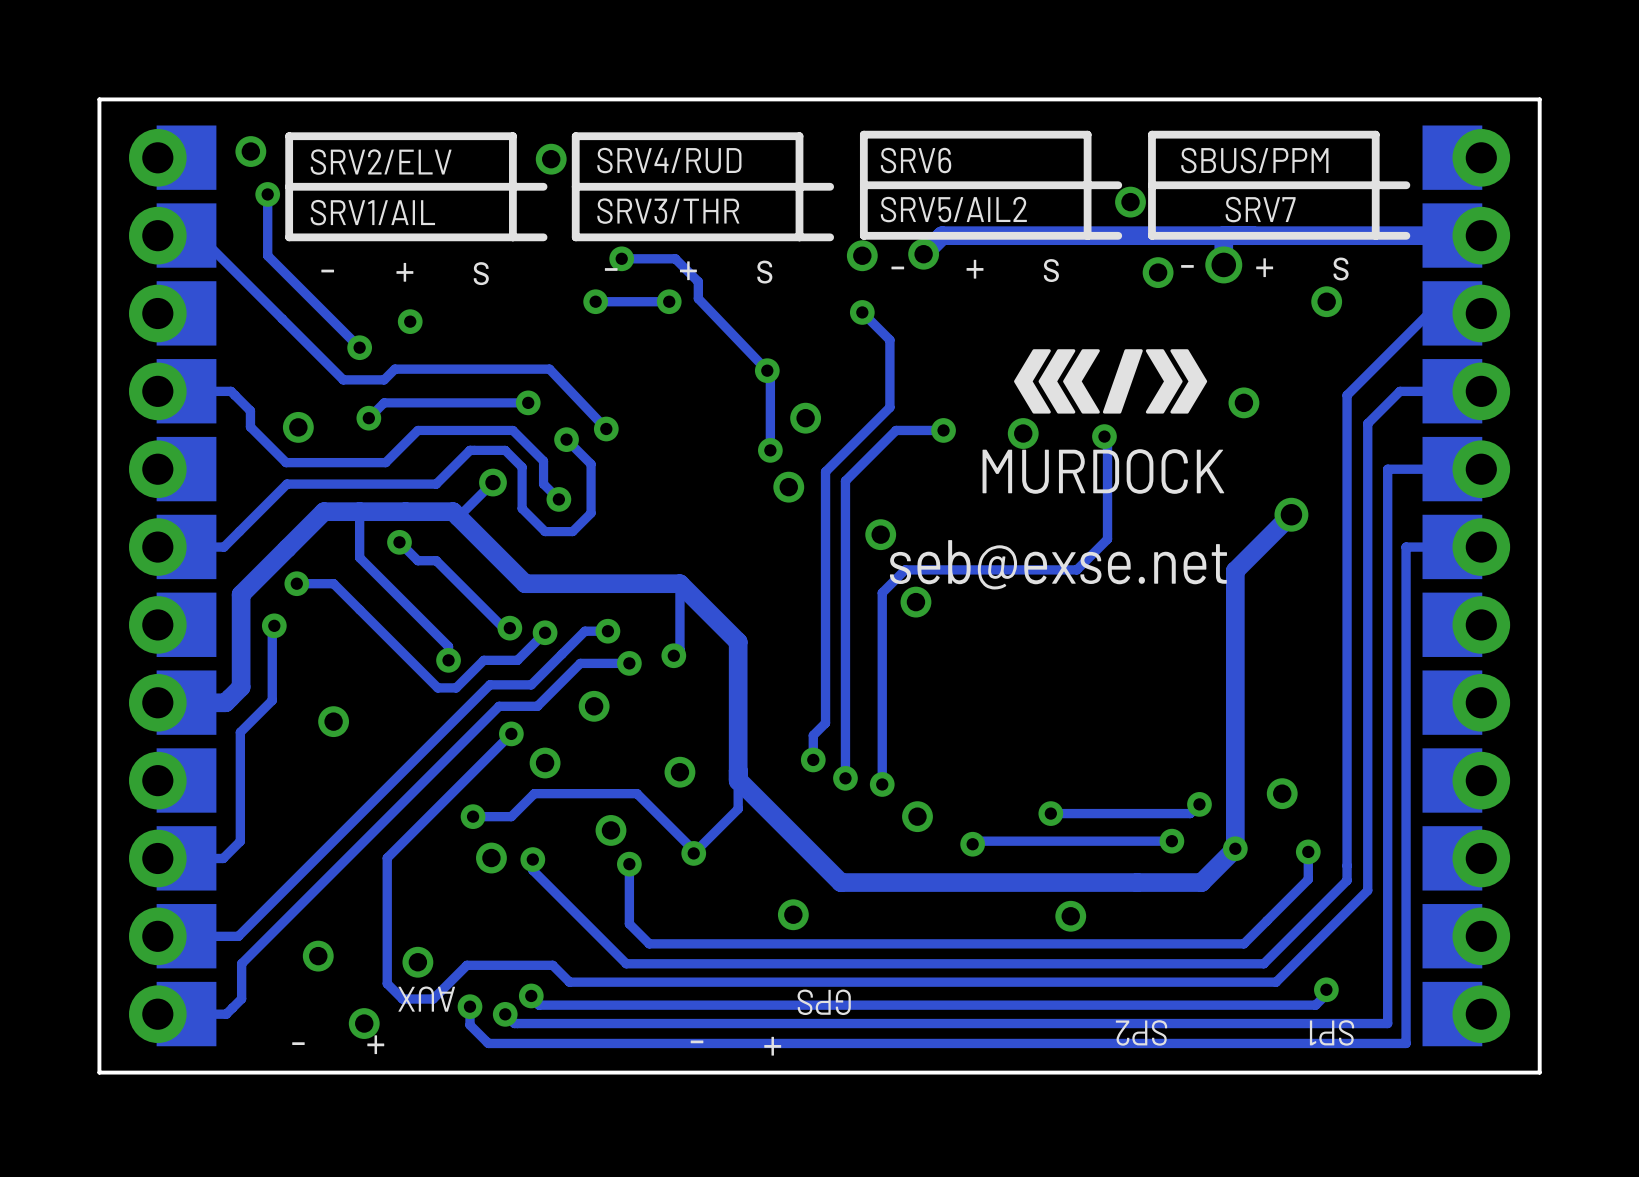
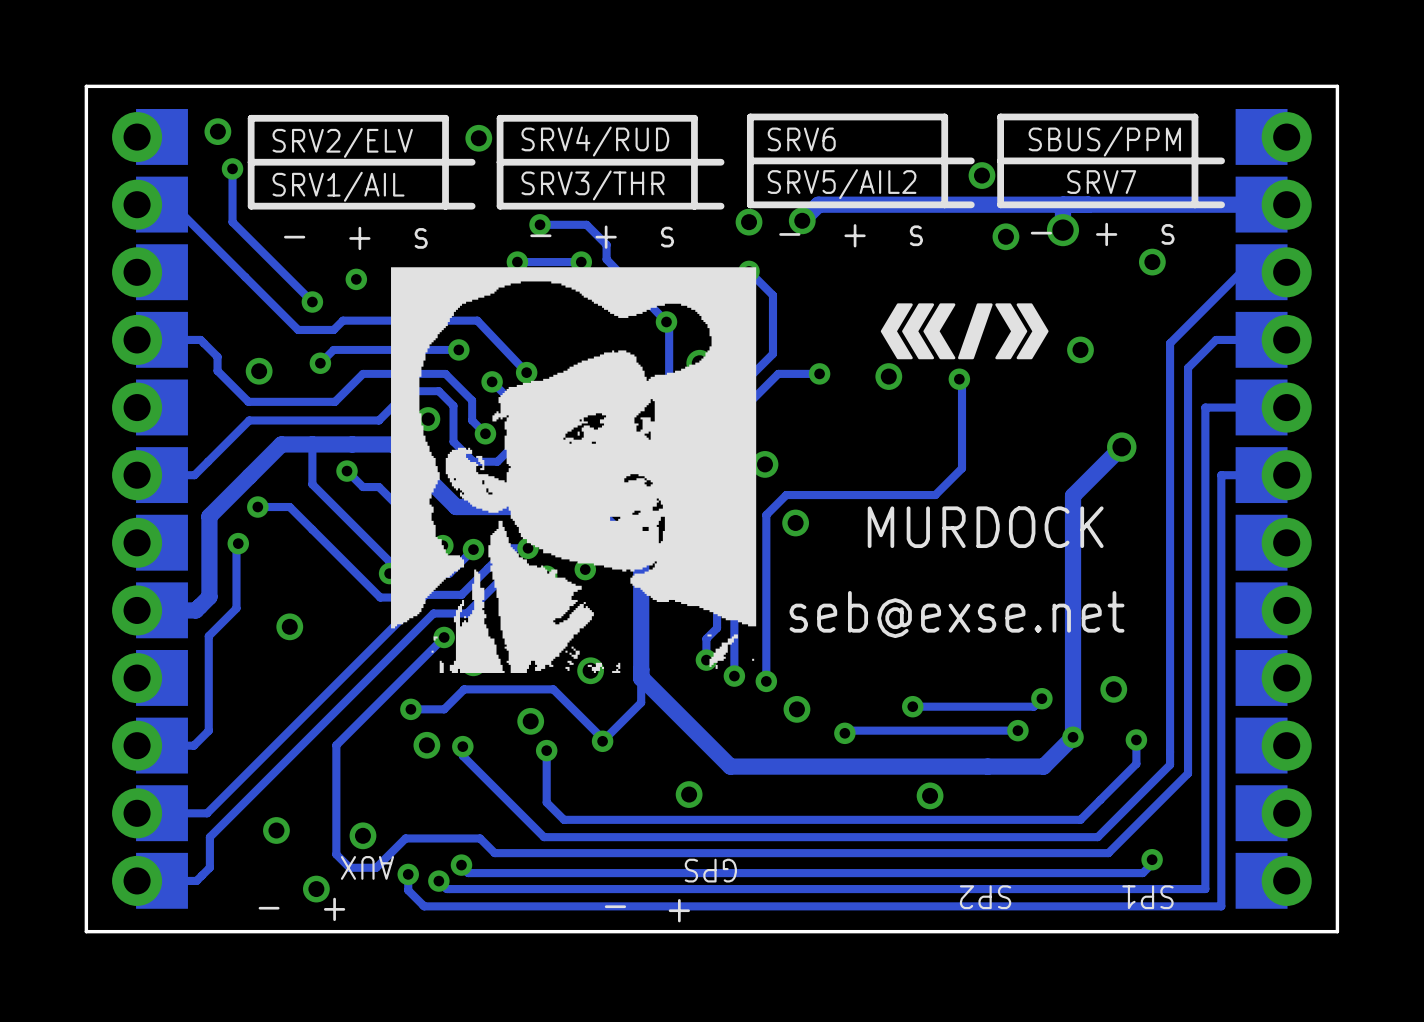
drawing: none -> [391, 267, 757, 674]
text position: MURDOCK (1103, 471) -> MURDOCK (985, 527)
text position: seb@exse.net (1058, 564) -> seb@exse.net (957, 614)

